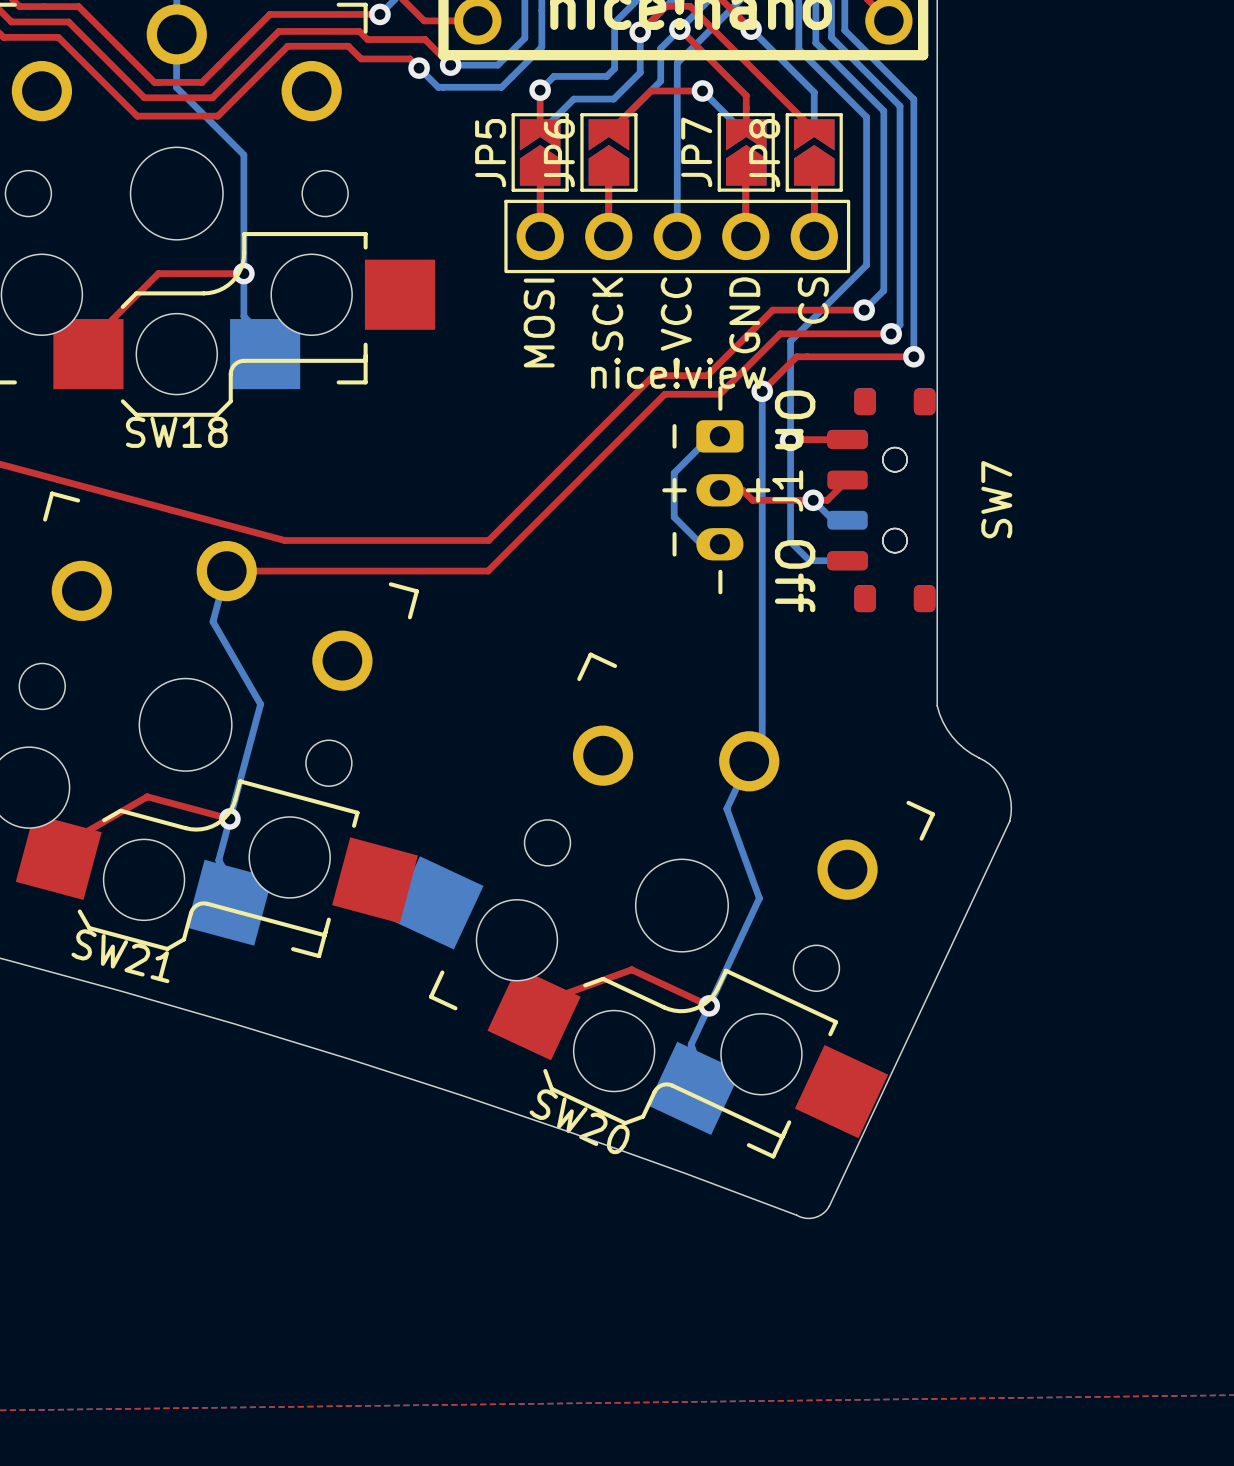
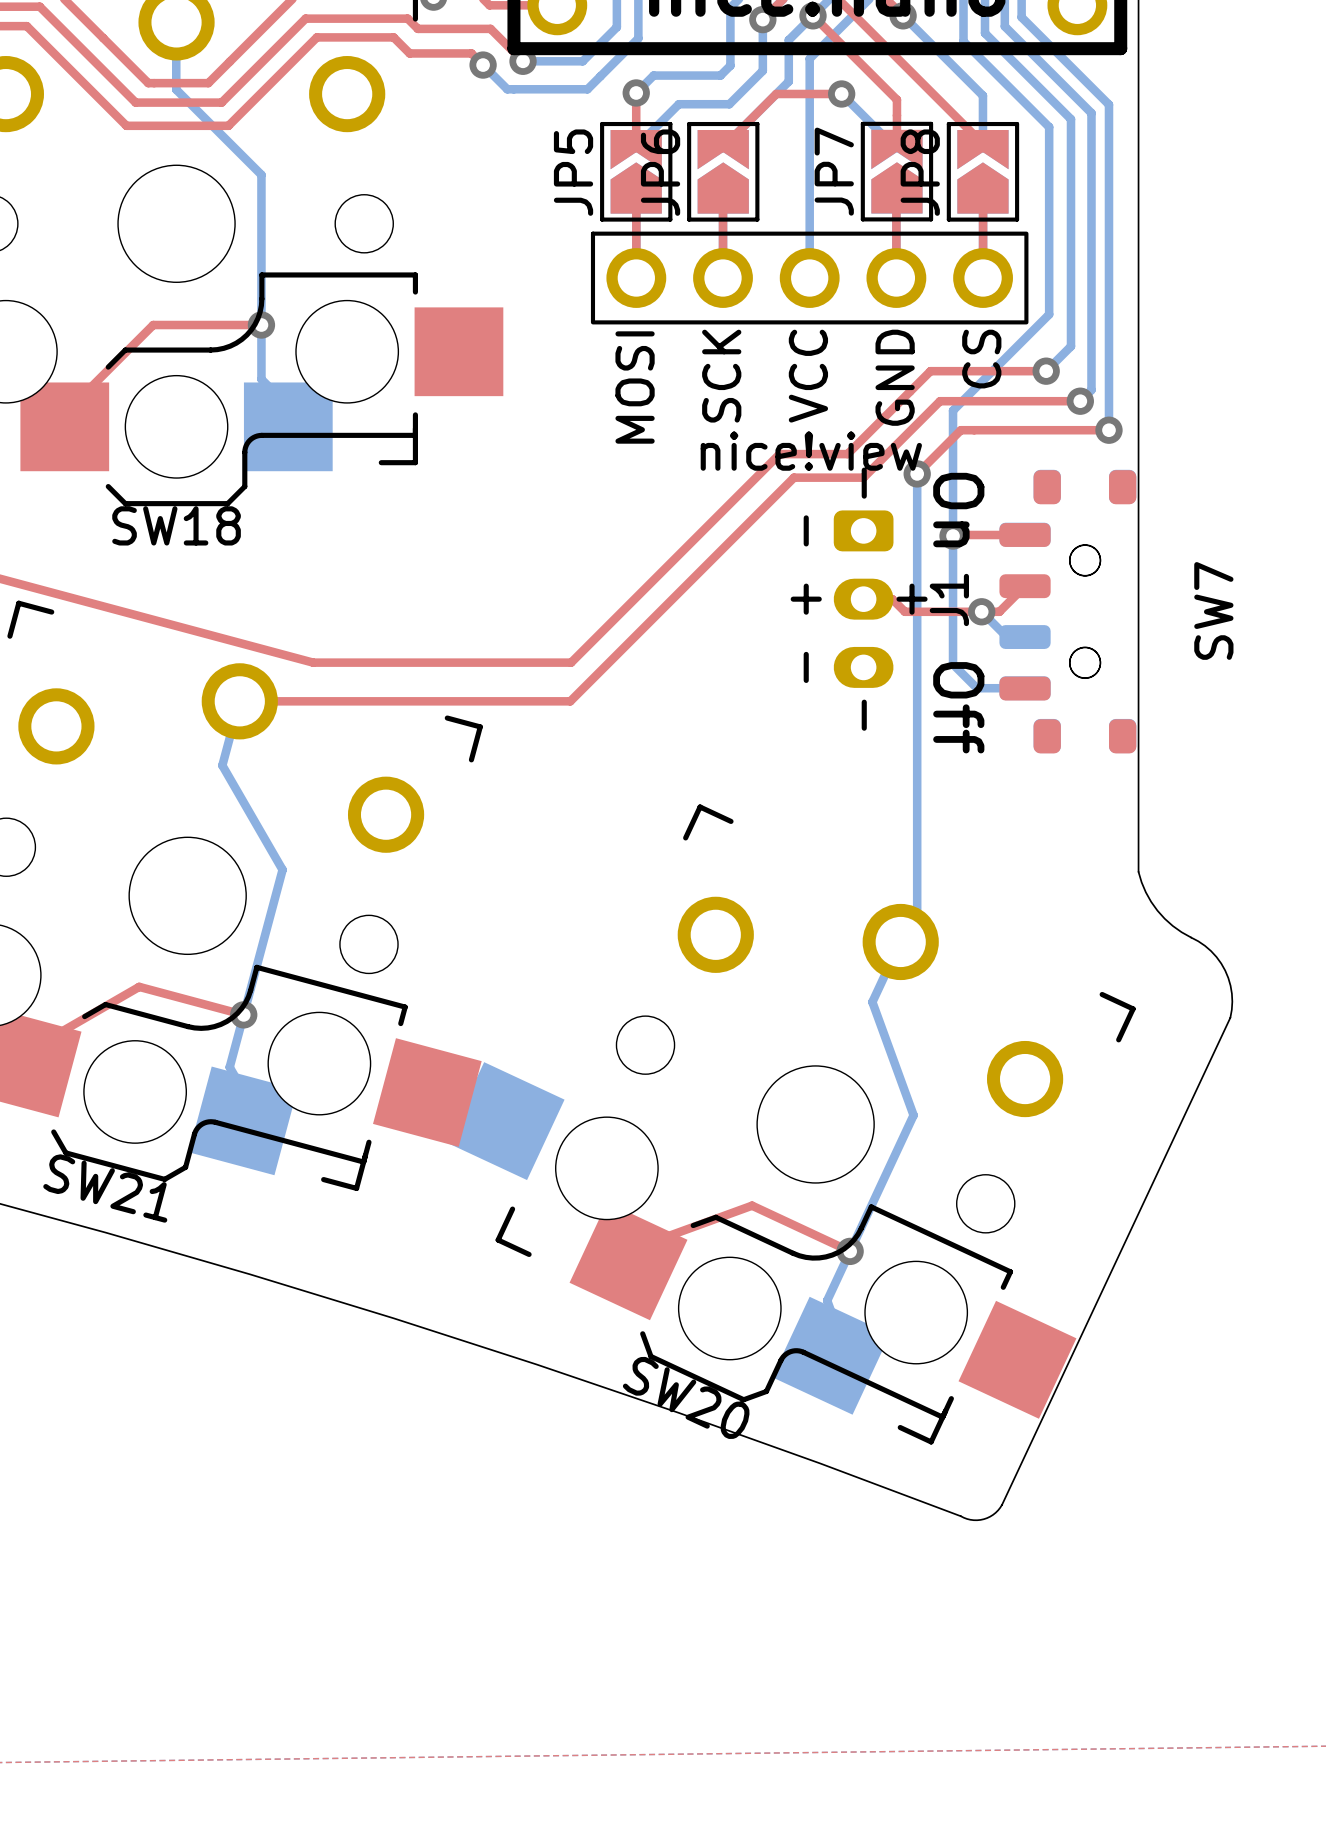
bottom track: (710, 436) (674, 472) (674, 517) (701, 544) -> none

